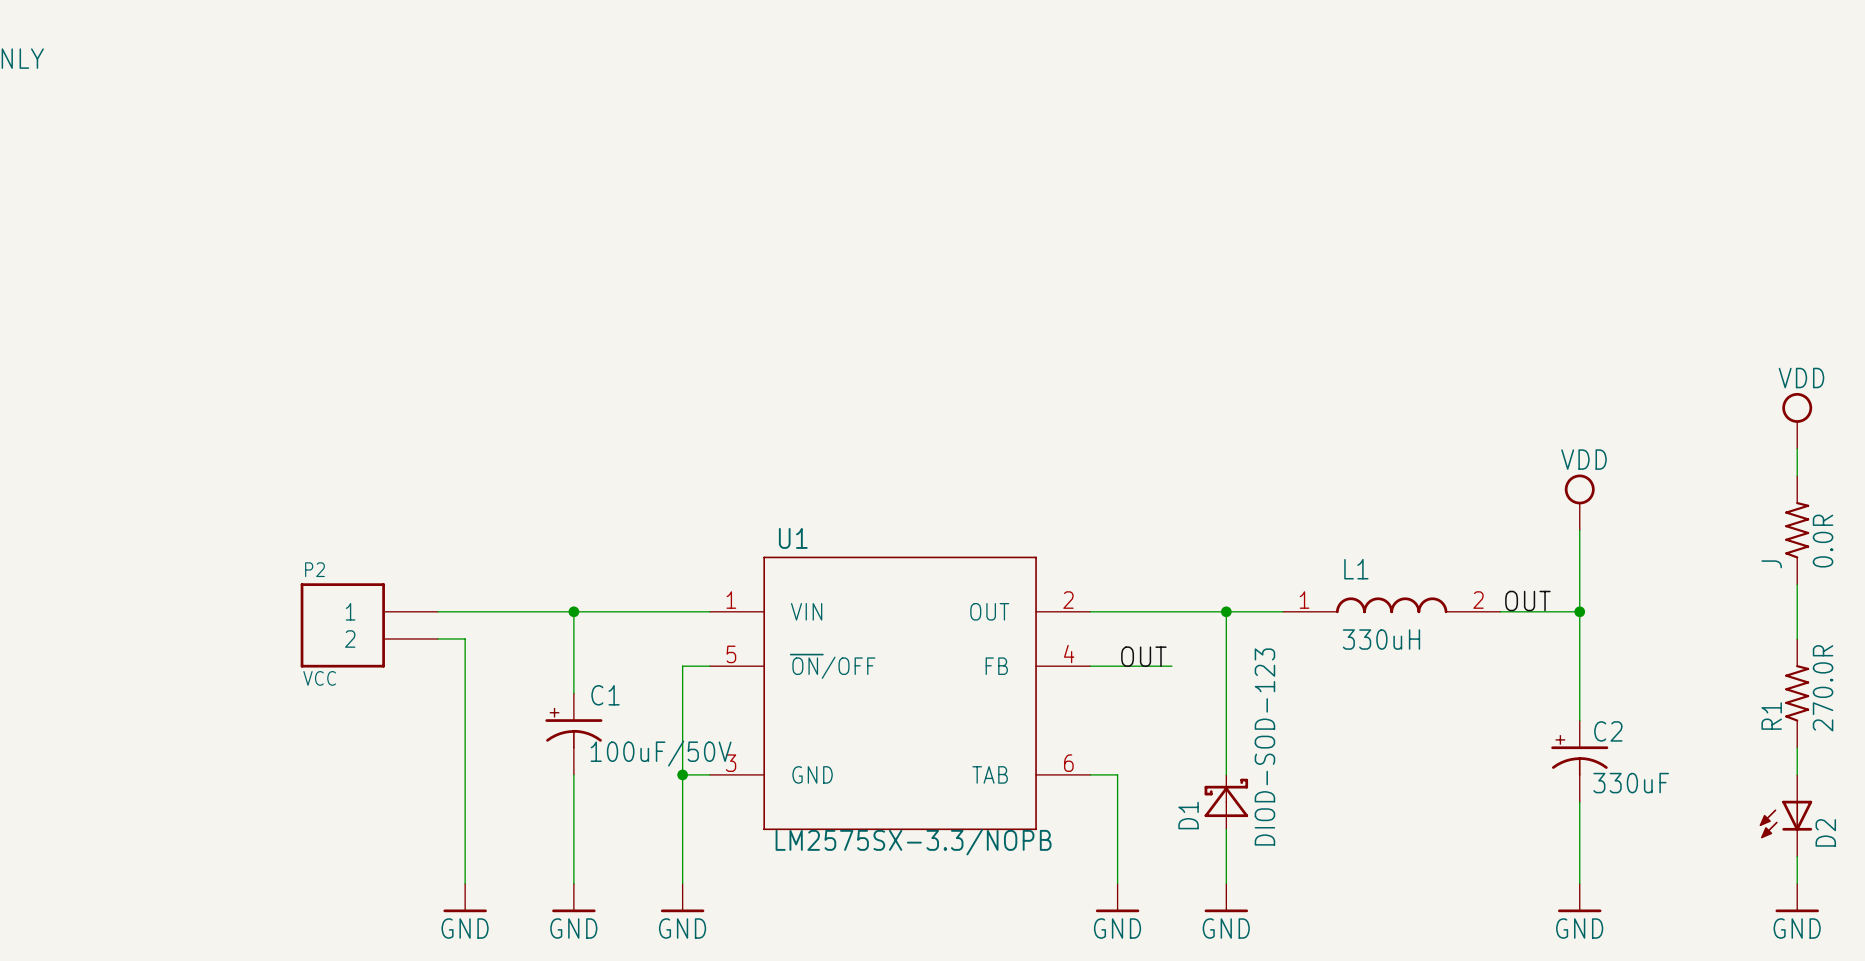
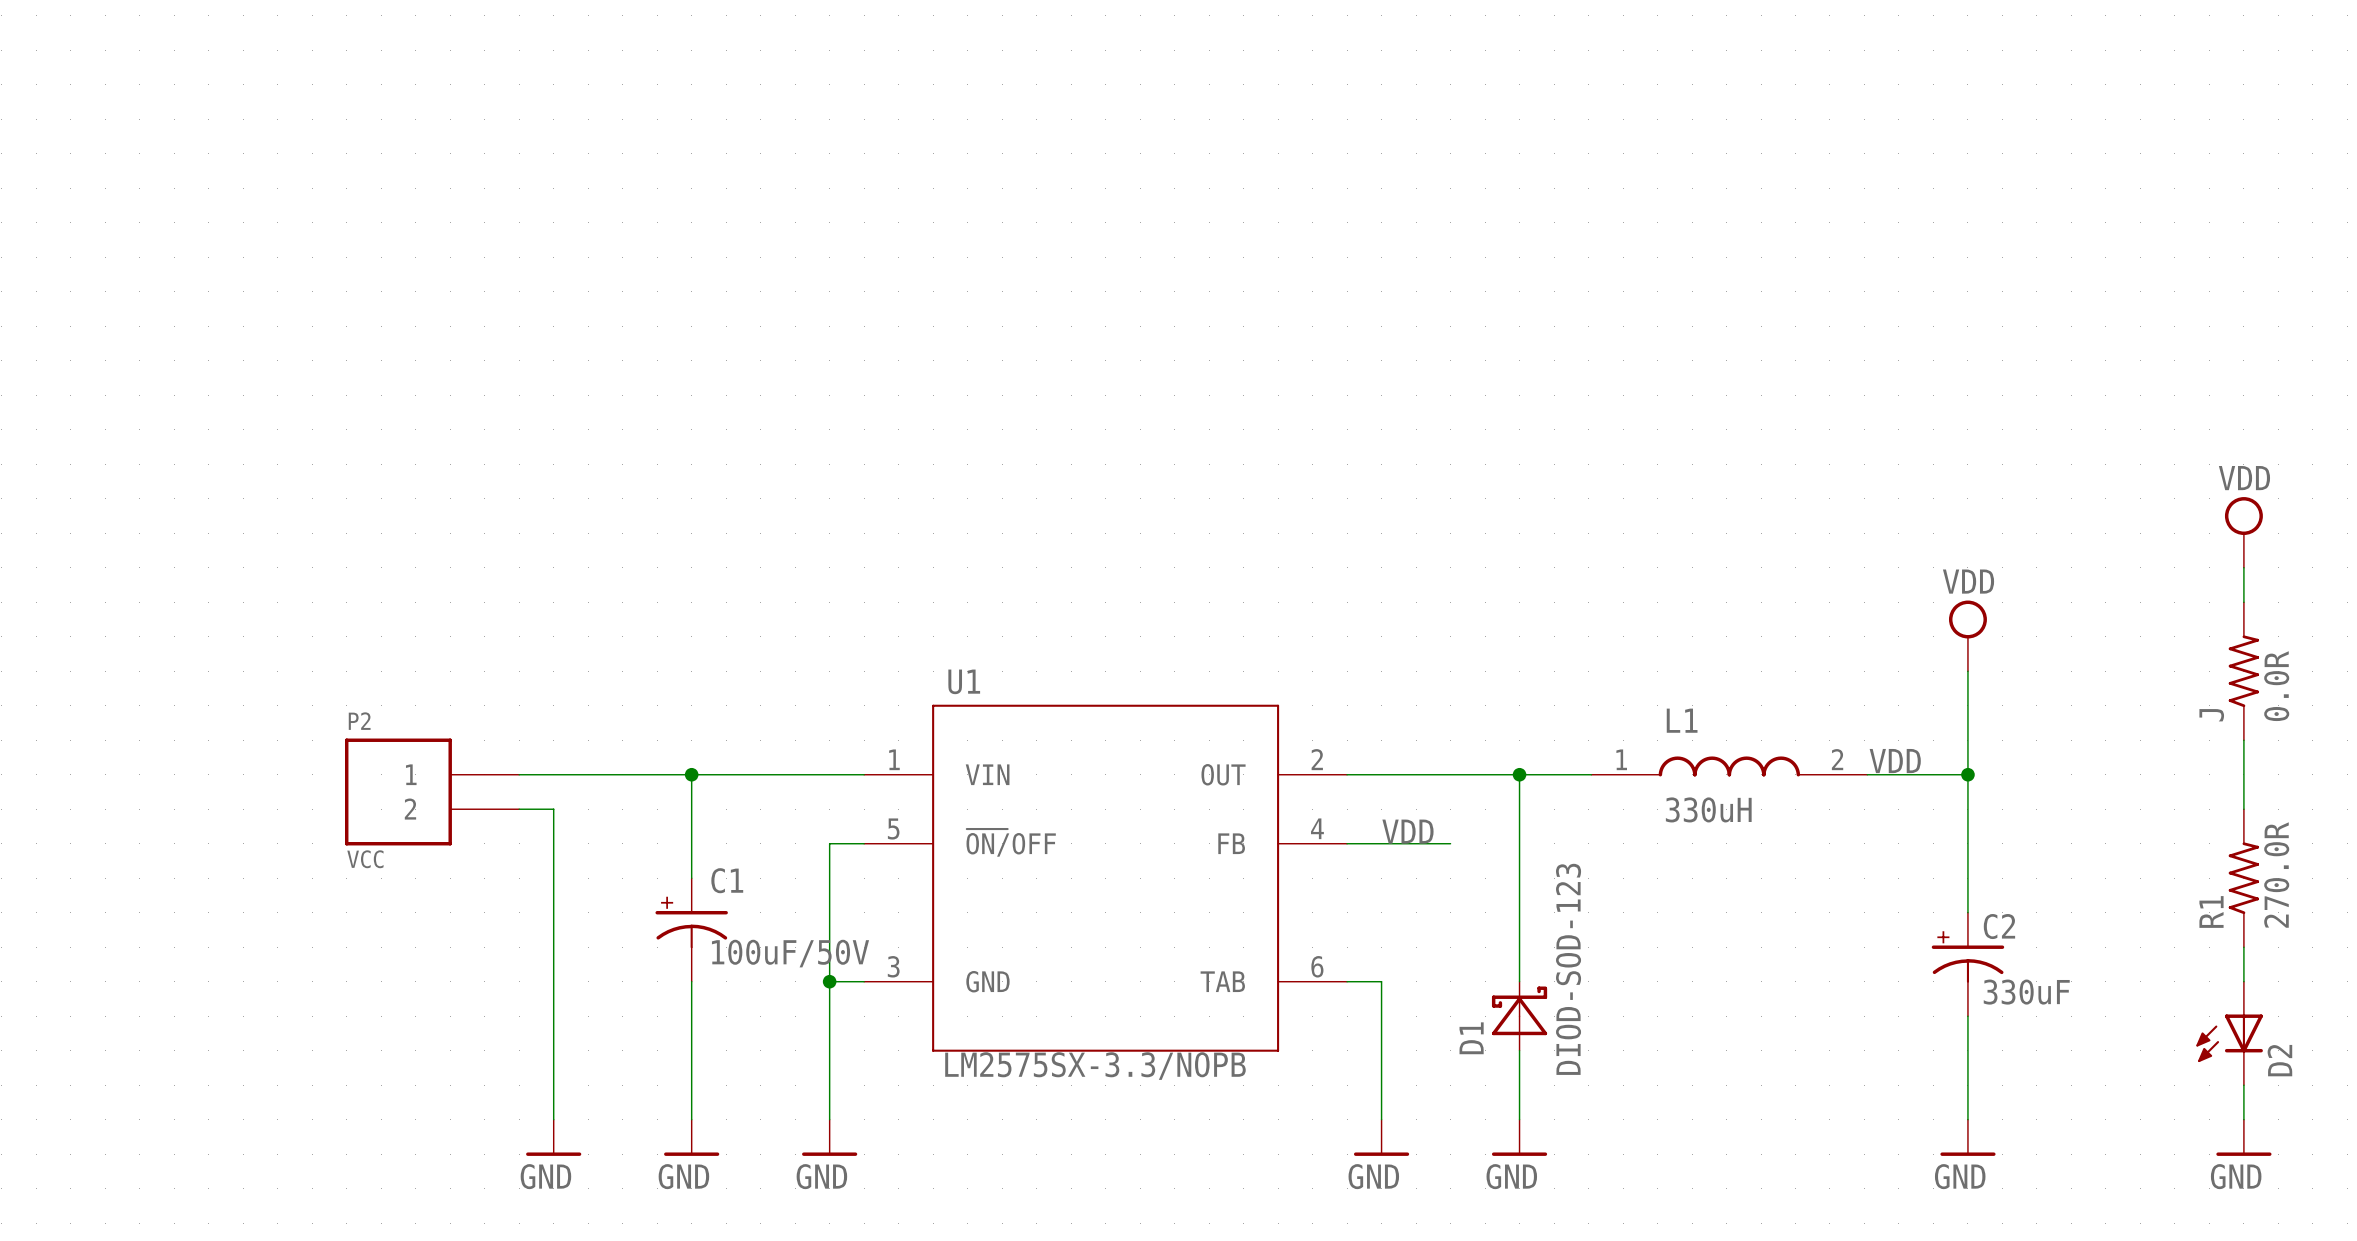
label: OUT (1527, 601) -> VDD (1895, 761)
label: OUT (1143, 656) -> VDD (1407, 831)

